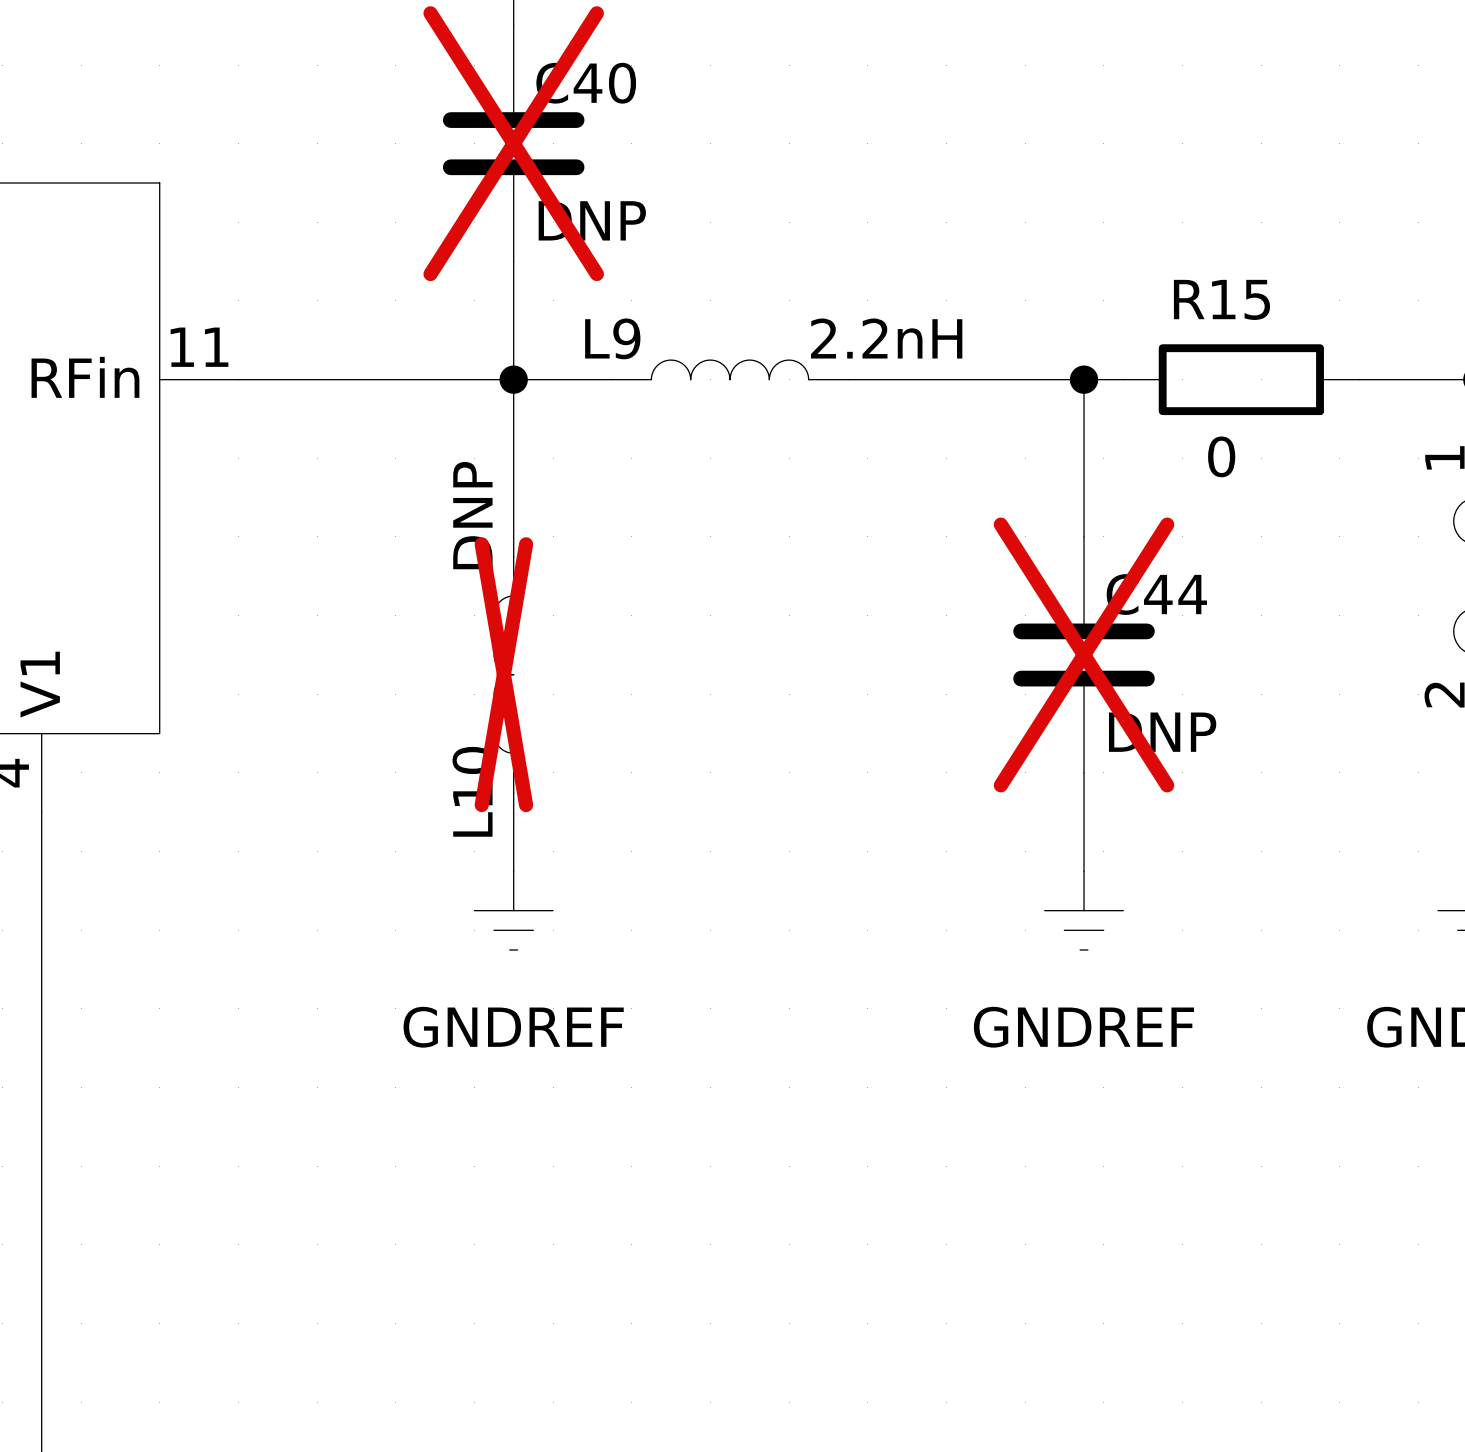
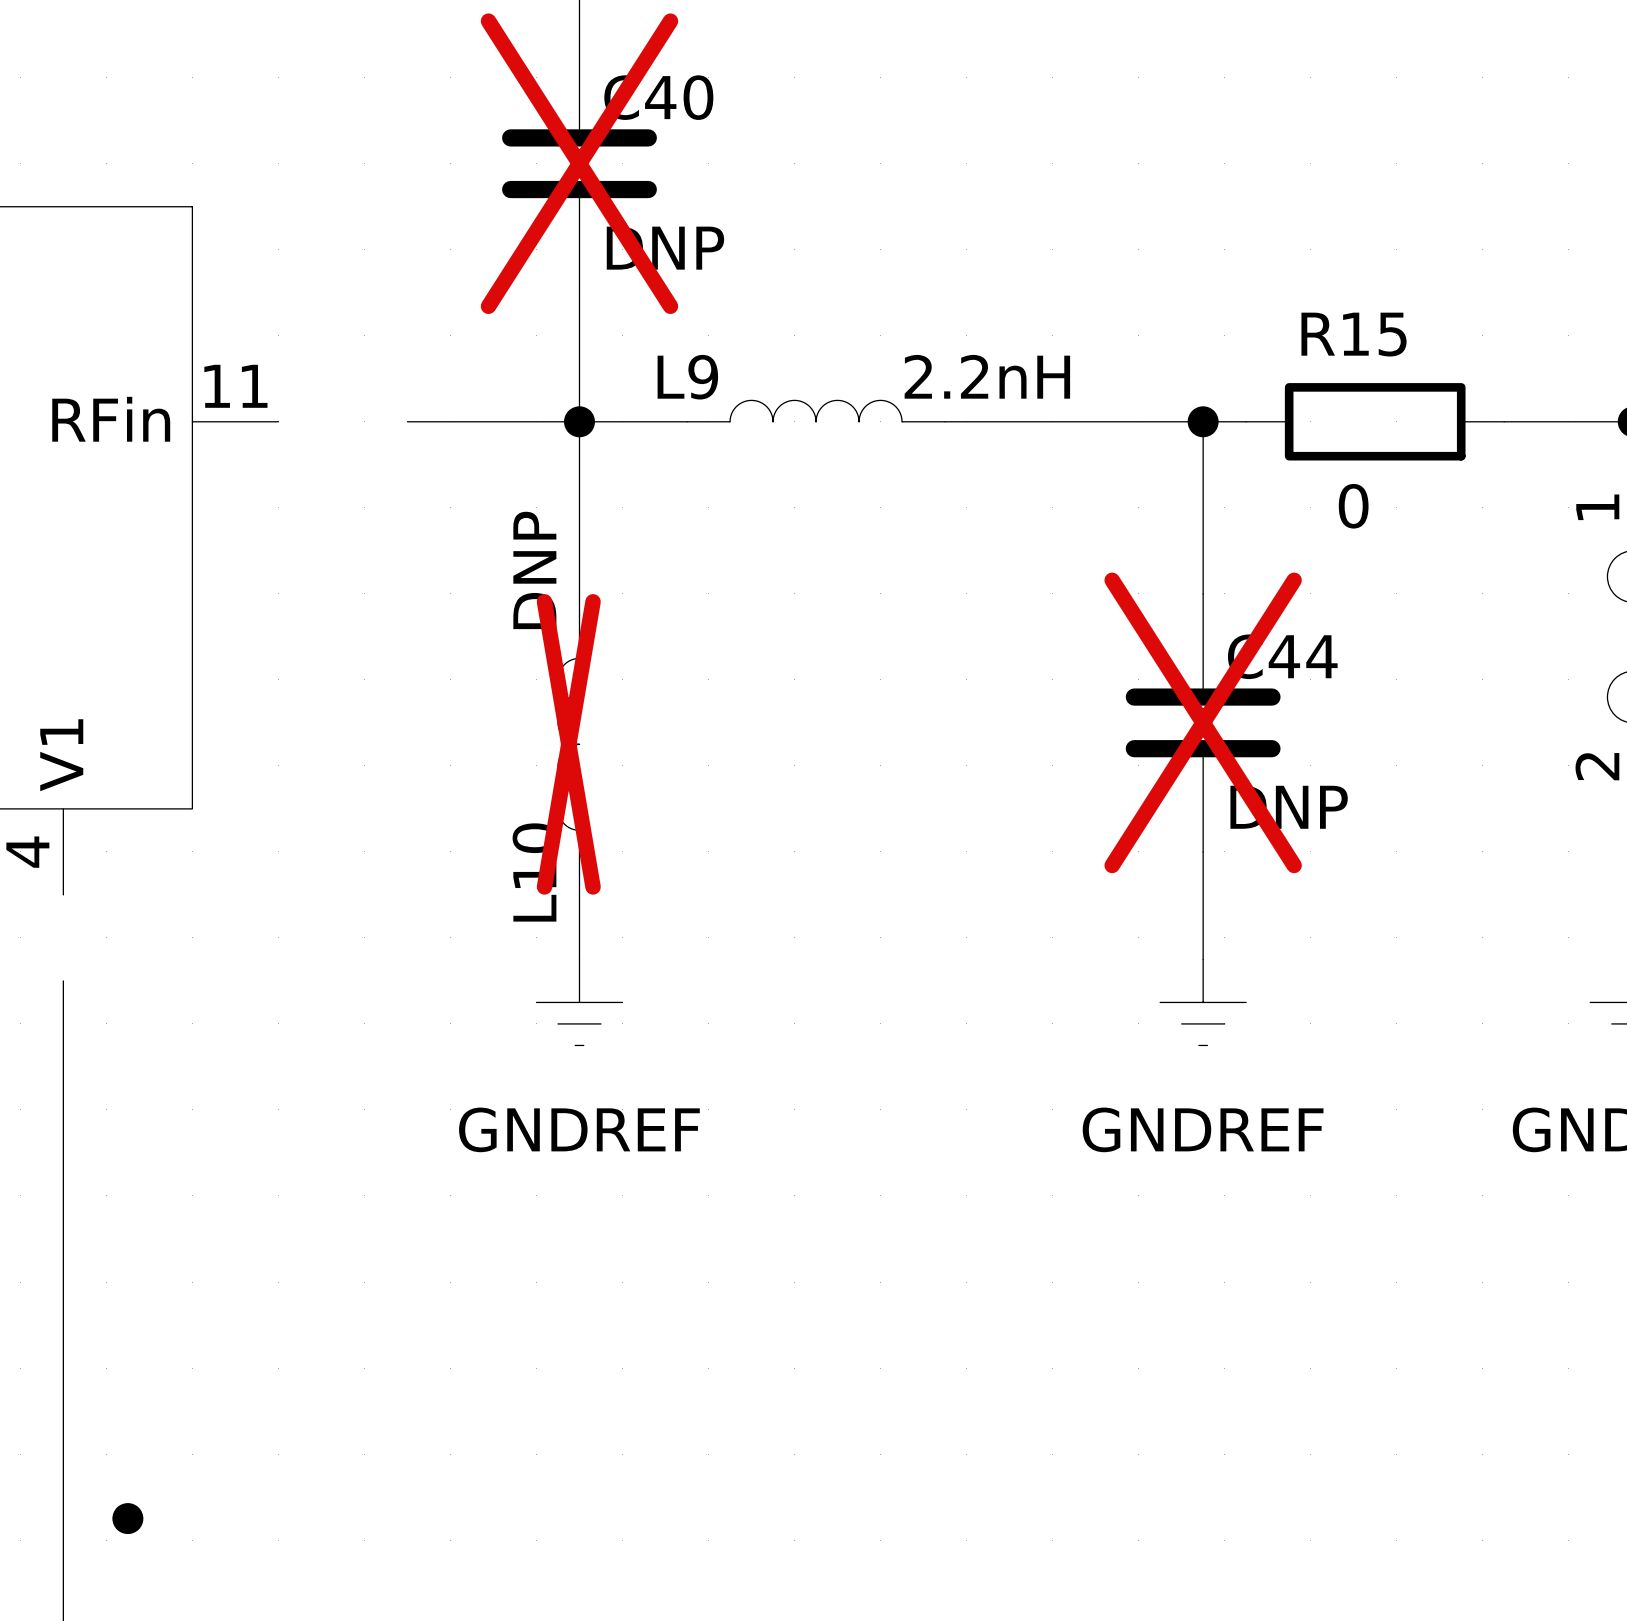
wire: (238, 379) (356, 379) -> none
wire: (41, 812) (41, 890) -> none
junction: none -> (127, 1518)

